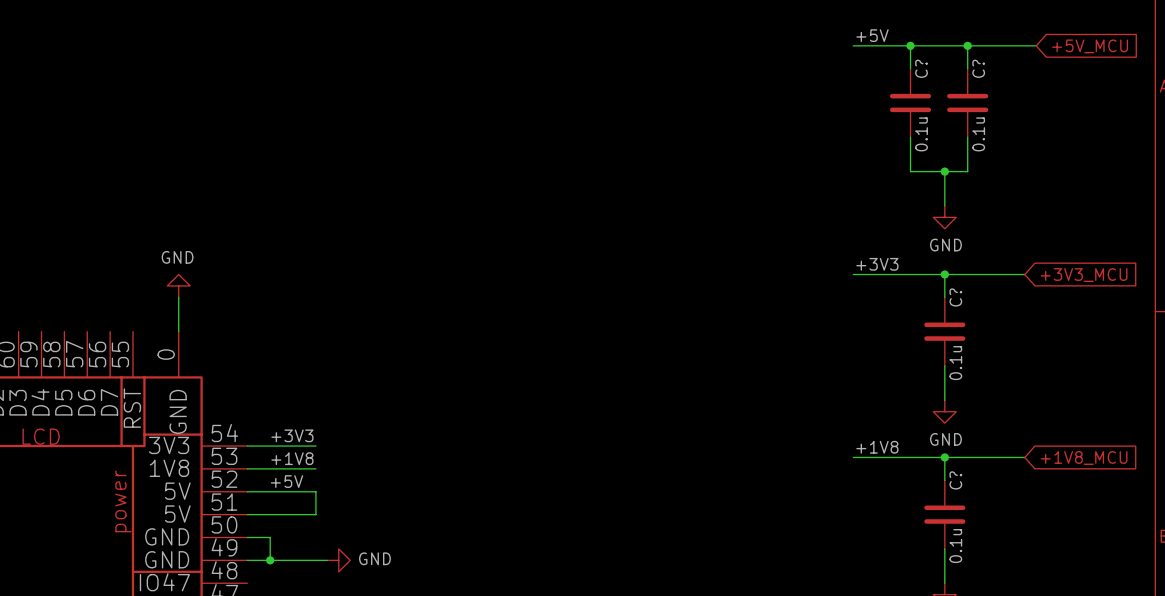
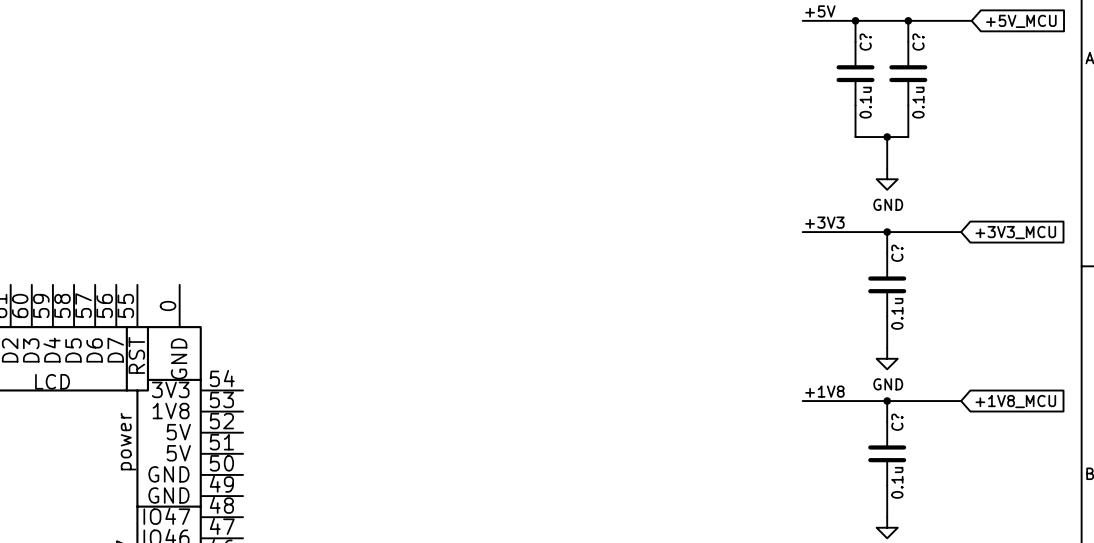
power symbol: GND (178, 285) -> none
wire: (178, 297) (178, 331) -> none
label: +3V3 (292, 435) -> none
wire: (247, 446) (315, 446) -> none
label: +1V8 (292, 458) -> none
wire: (247, 468) (315, 468) -> none
label: +5V (286, 481) -> none
wire: (247, 491) (315, 491) (315, 514) (247, 514) -> none
wire: (247, 537) (270, 537) (270, 560) -> none
wire: (247, 560) (327, 560) -> none
junction: (270, 560) -> none
power symbol: GND (338, 560) -> none

